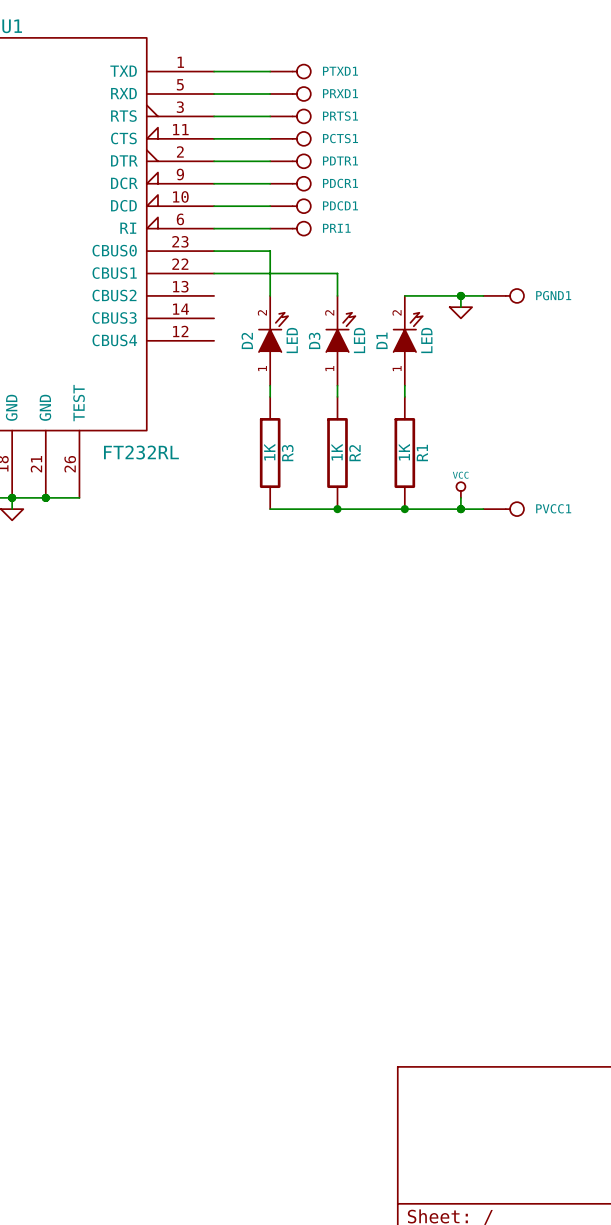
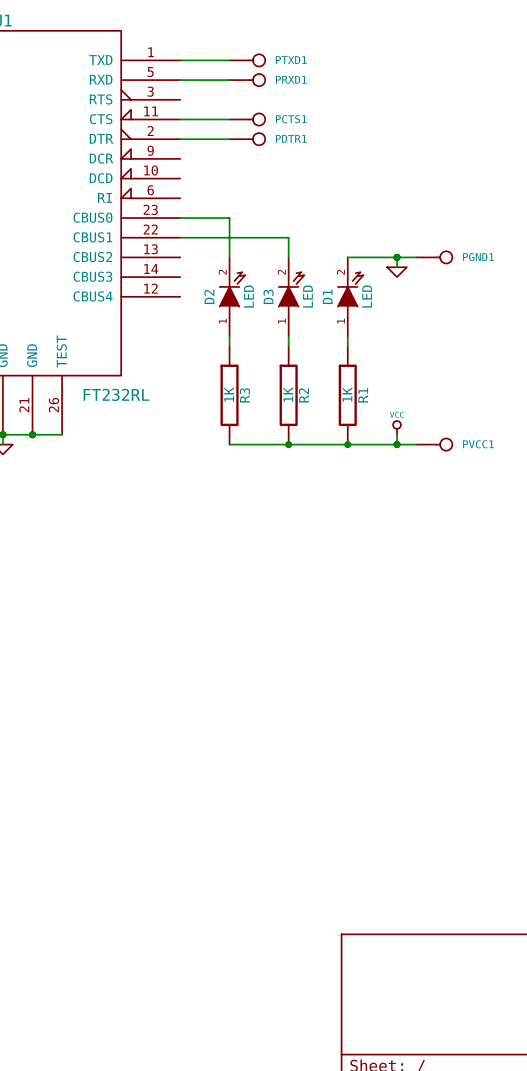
wire: (214, 116) (270, 116) -> none
PRTS1: (290, 116) -> none
wire: (214, 183) (270, 183) -> none
PDCR1: (290, 183) -> none
wire: (214, 206) (270, 206) -> none
PDCD1: (290, 206) -> none
wire: (214, 228) (270, 228) -> none
PRI1: (290, 228) -> none

